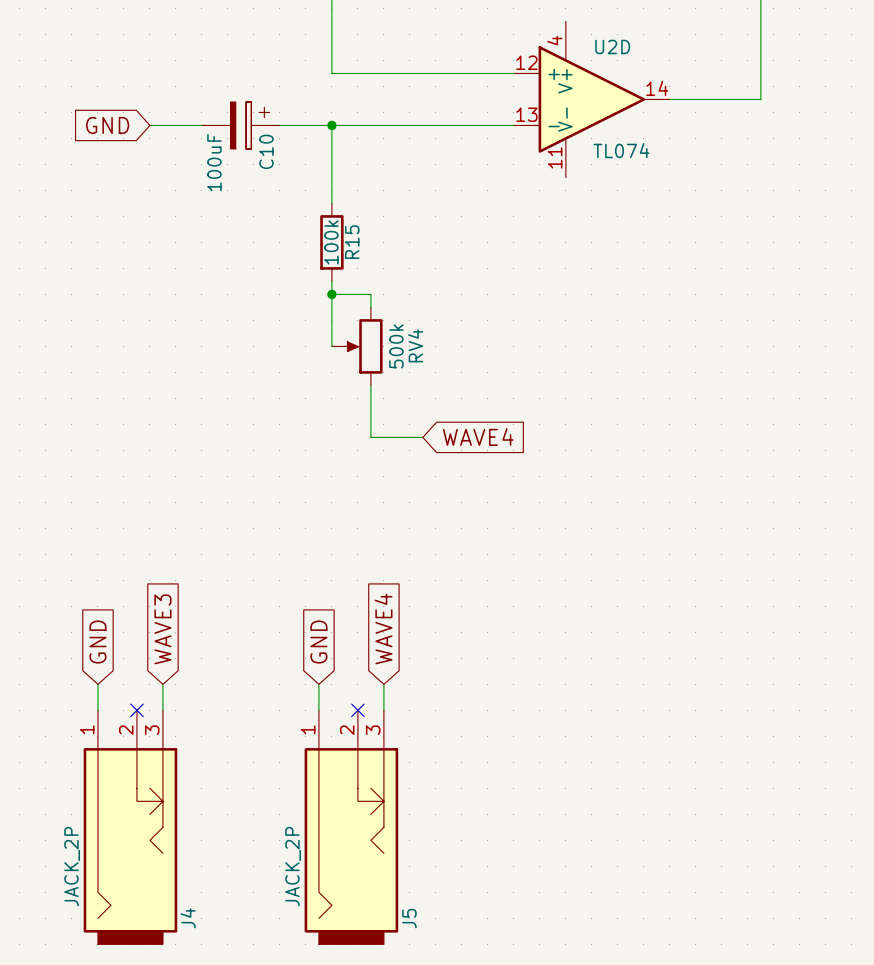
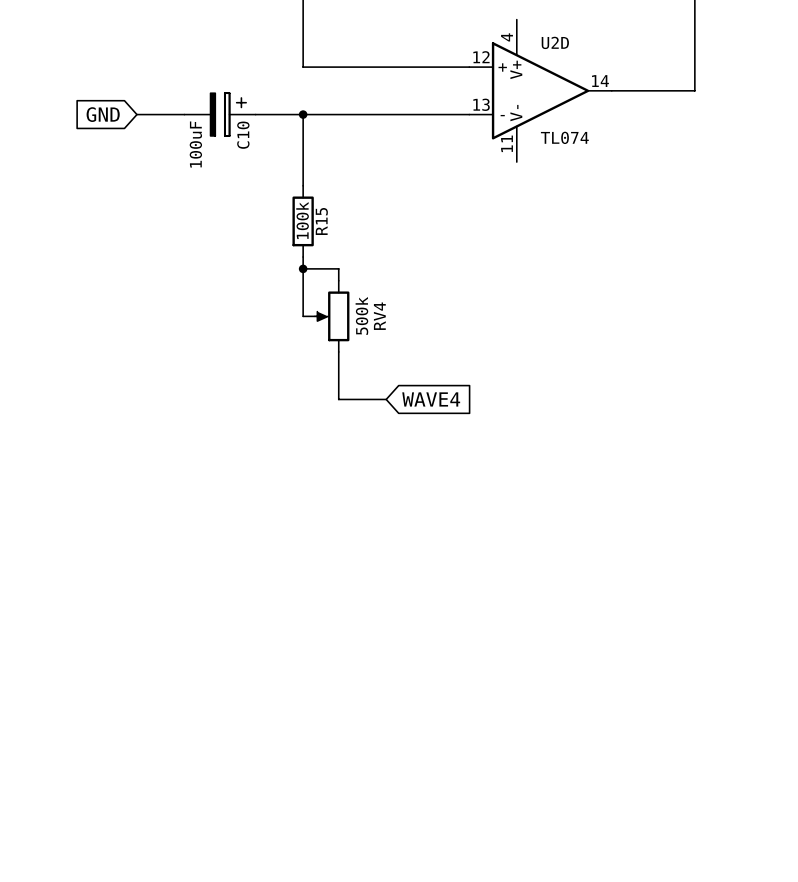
global label: WAVE3 (162, 629) -> none
global label: WAVE4 (383, 629) -> none
global label: GND (97, 642) -> none
global label: GND (318, 642) -> none
wire: (97, 684) (97, 710) -> none
wire: (162, 684) (162, 710) -> none
wire: (318, 684) (318, 710) -> none
wire: (383, 684) (383, 710) -> none
no-connect mark: (136, 710) -> none
no-connect mark: (357, 710) -> none
J4: JACK_2P (130, 827) -> none
J5: JACK_2P (351, 827) -> none

